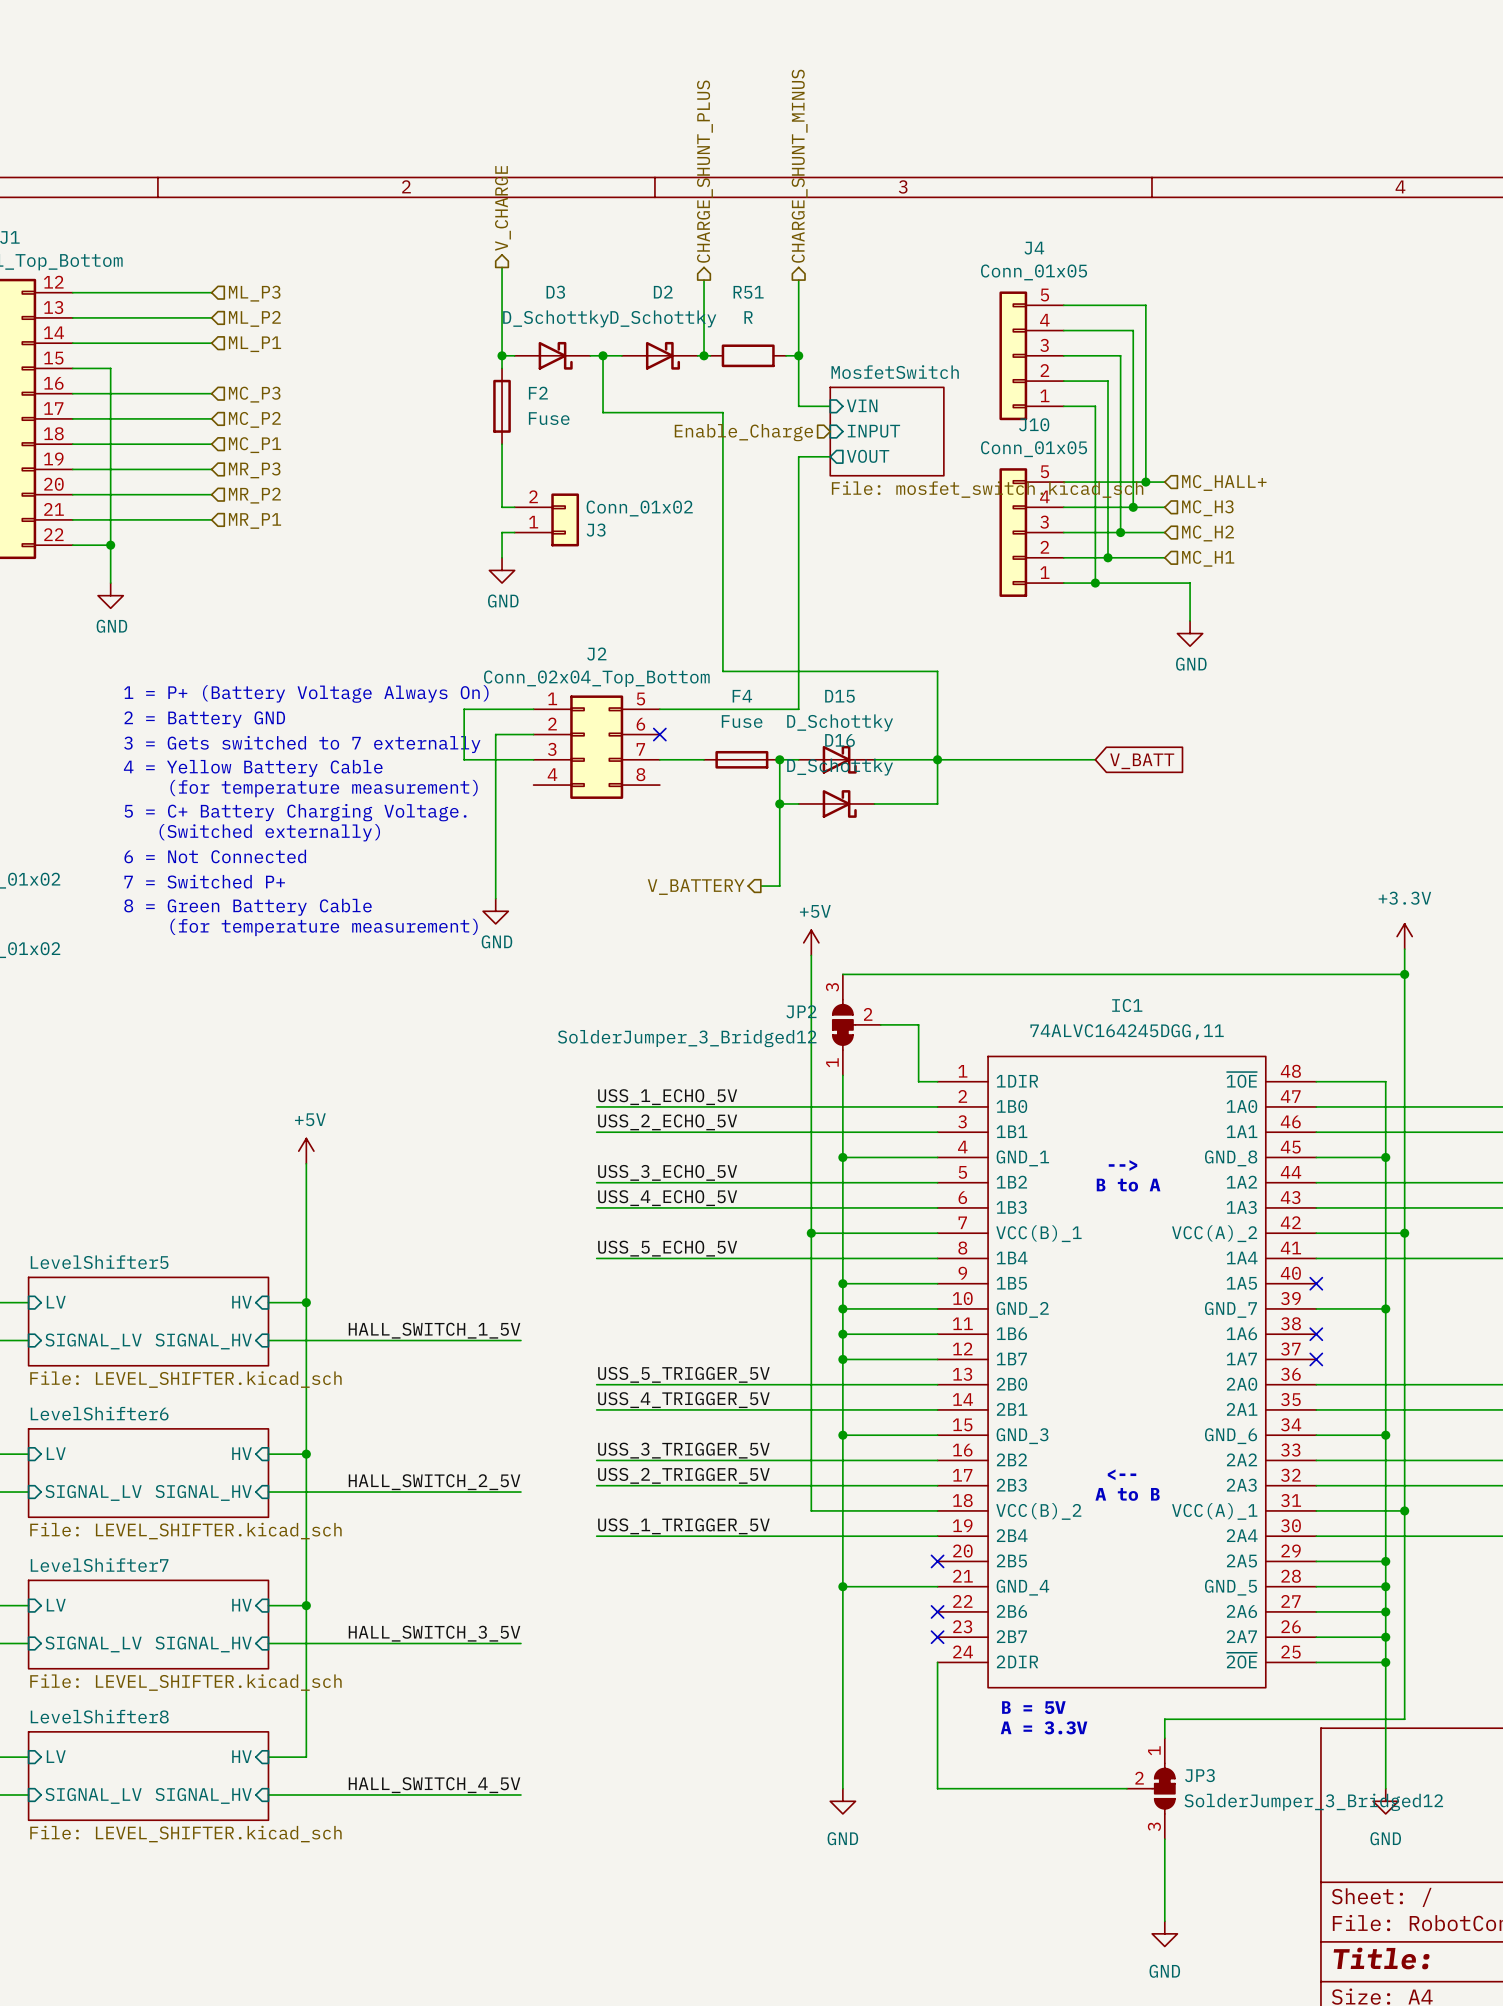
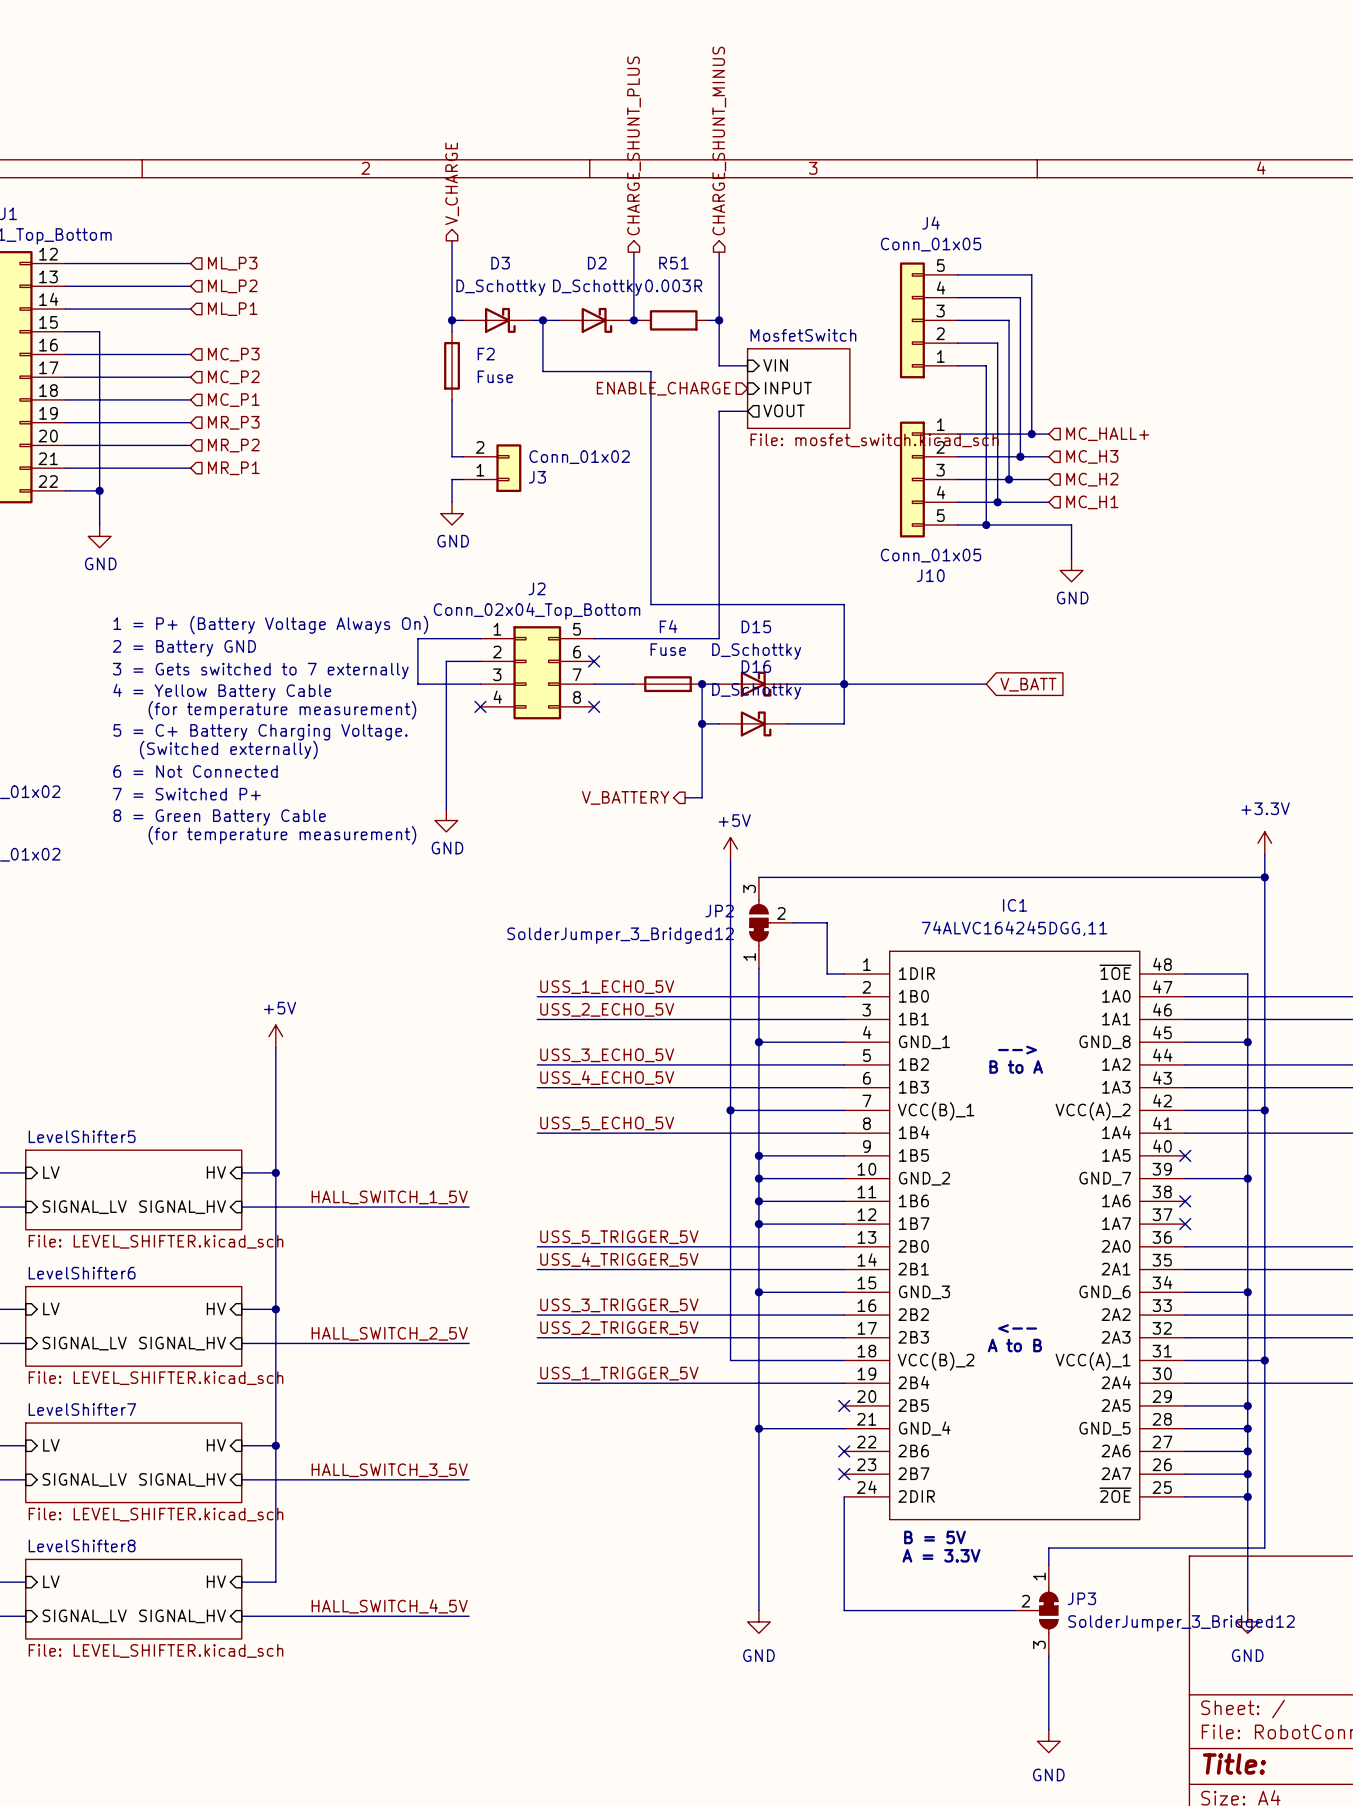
R51 value: R (748, 317) -> 0.003R (673, 285)
hierarchical label: Enable_Charge (743, 432) -> ENABLE_CHARGE (663, 388)
J10 flip: as is (1013, 532) -> up-down (912, 479)
no-connect mark: none -> (480, 706)
no-connect mark: none -> (594, 706)

